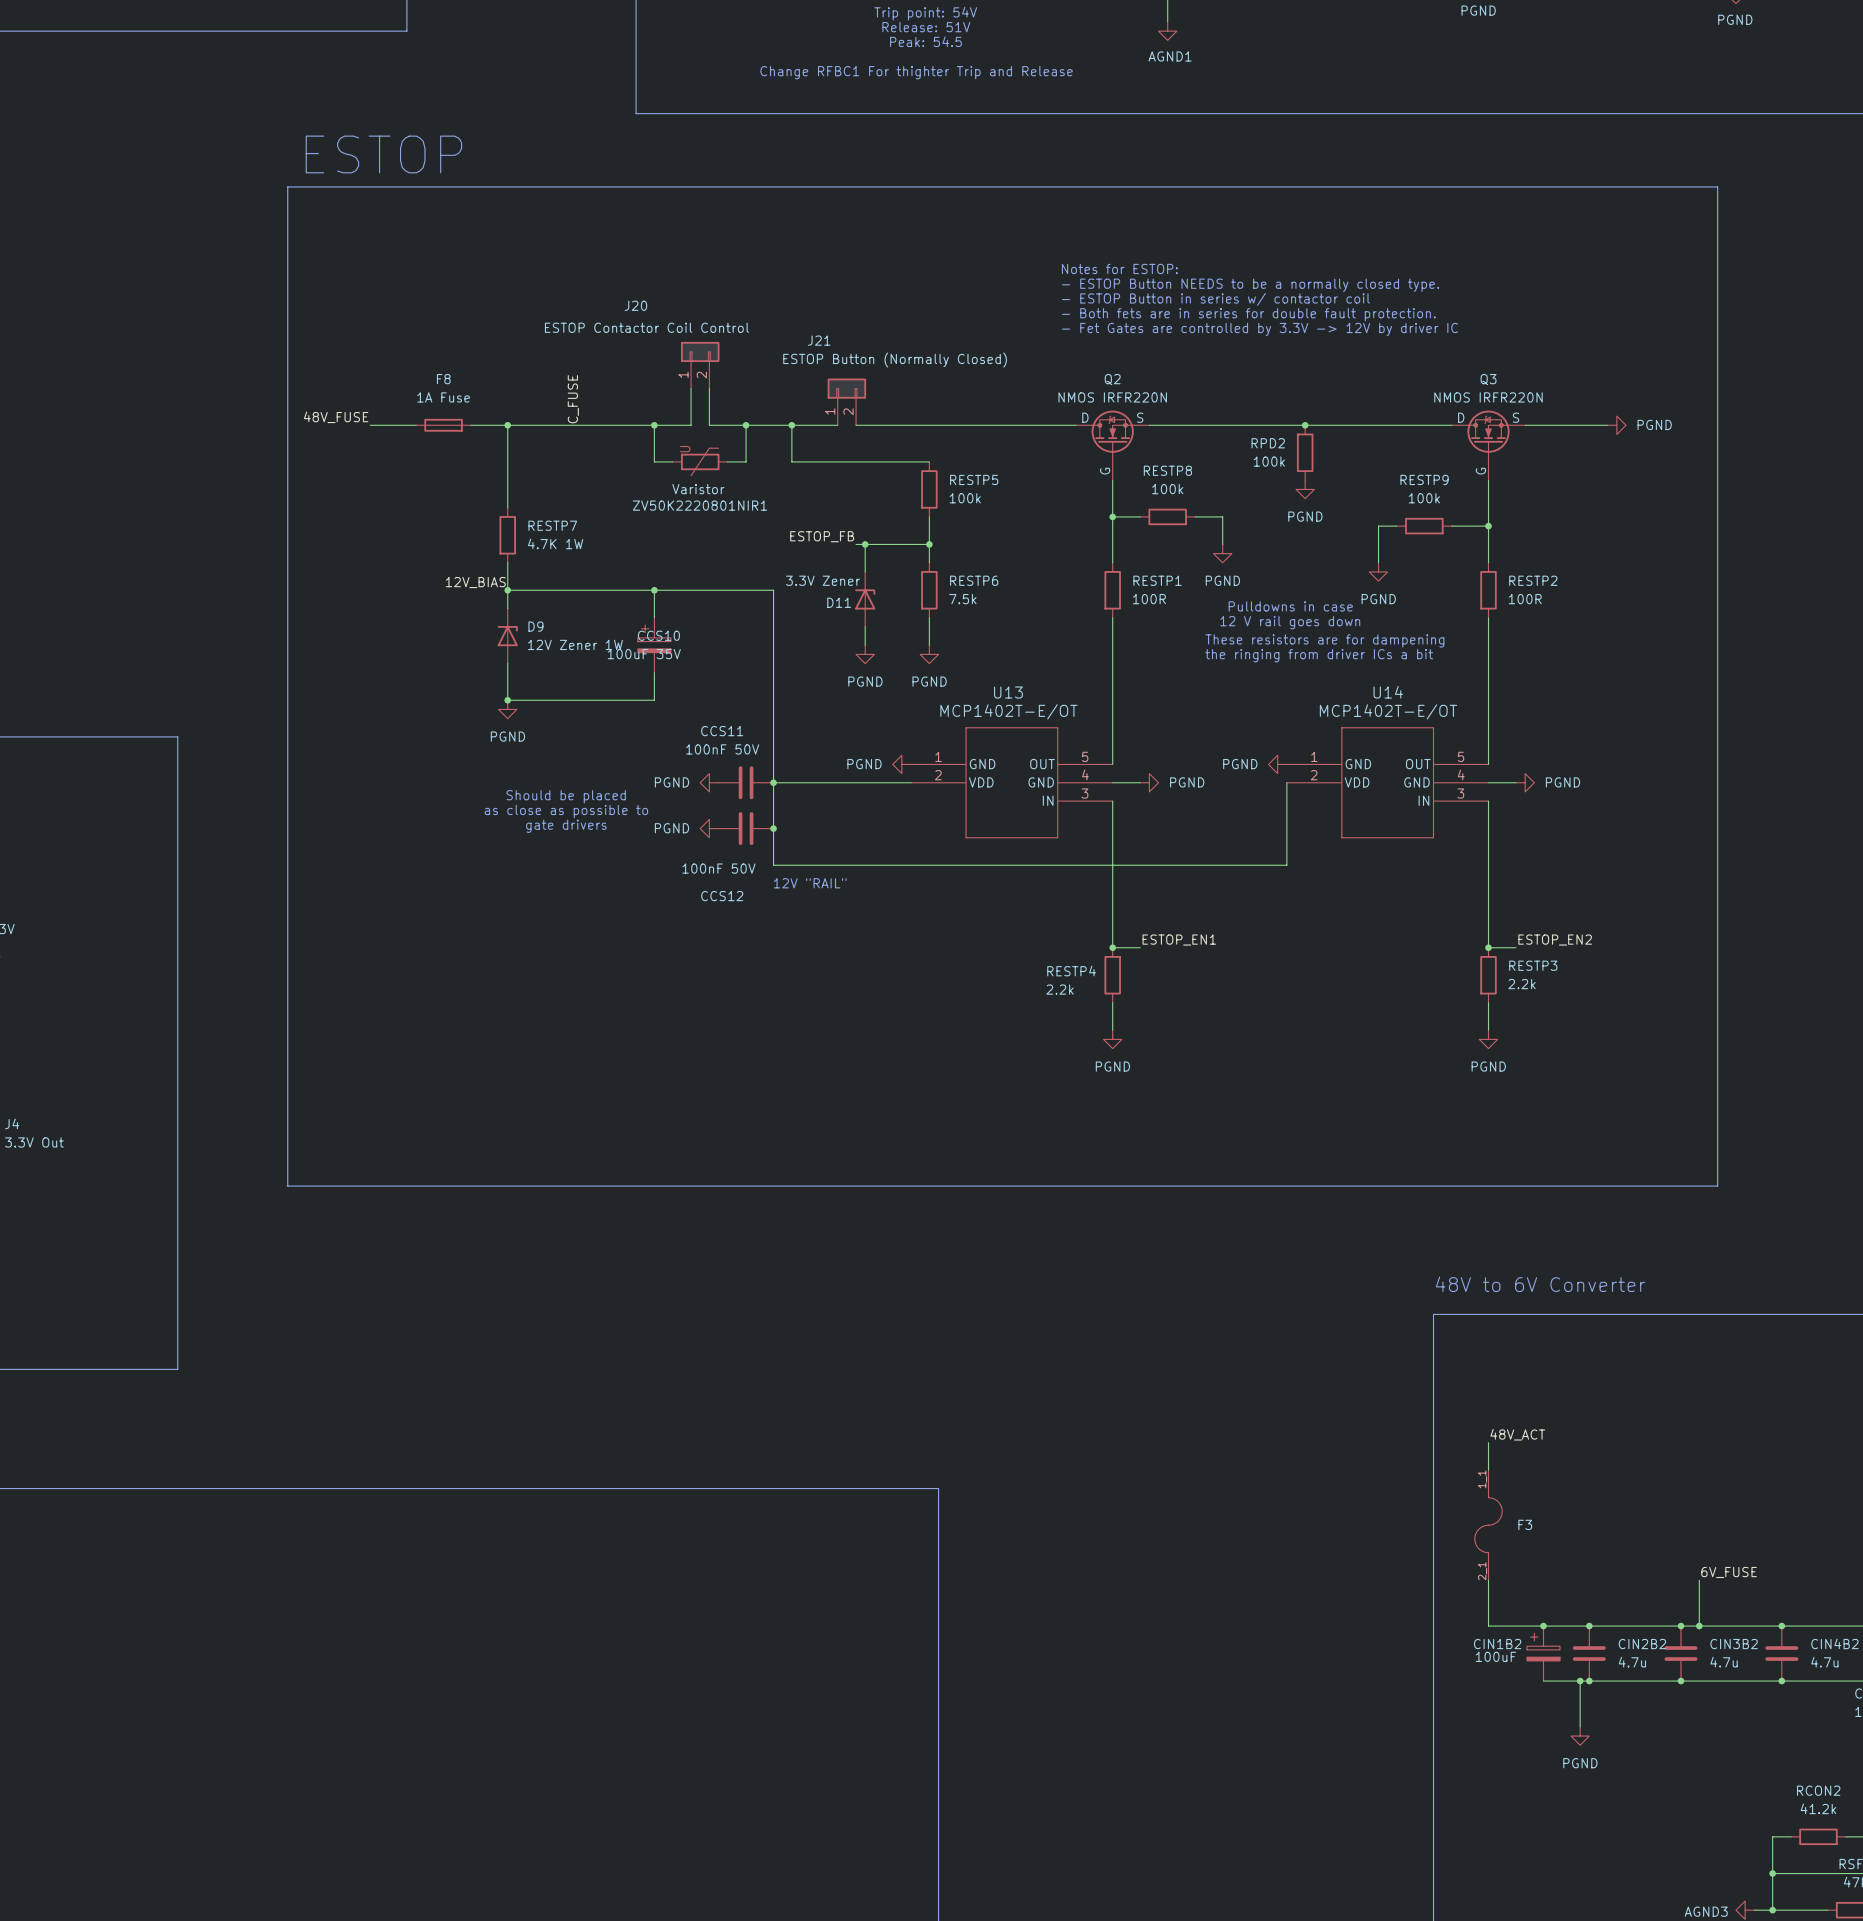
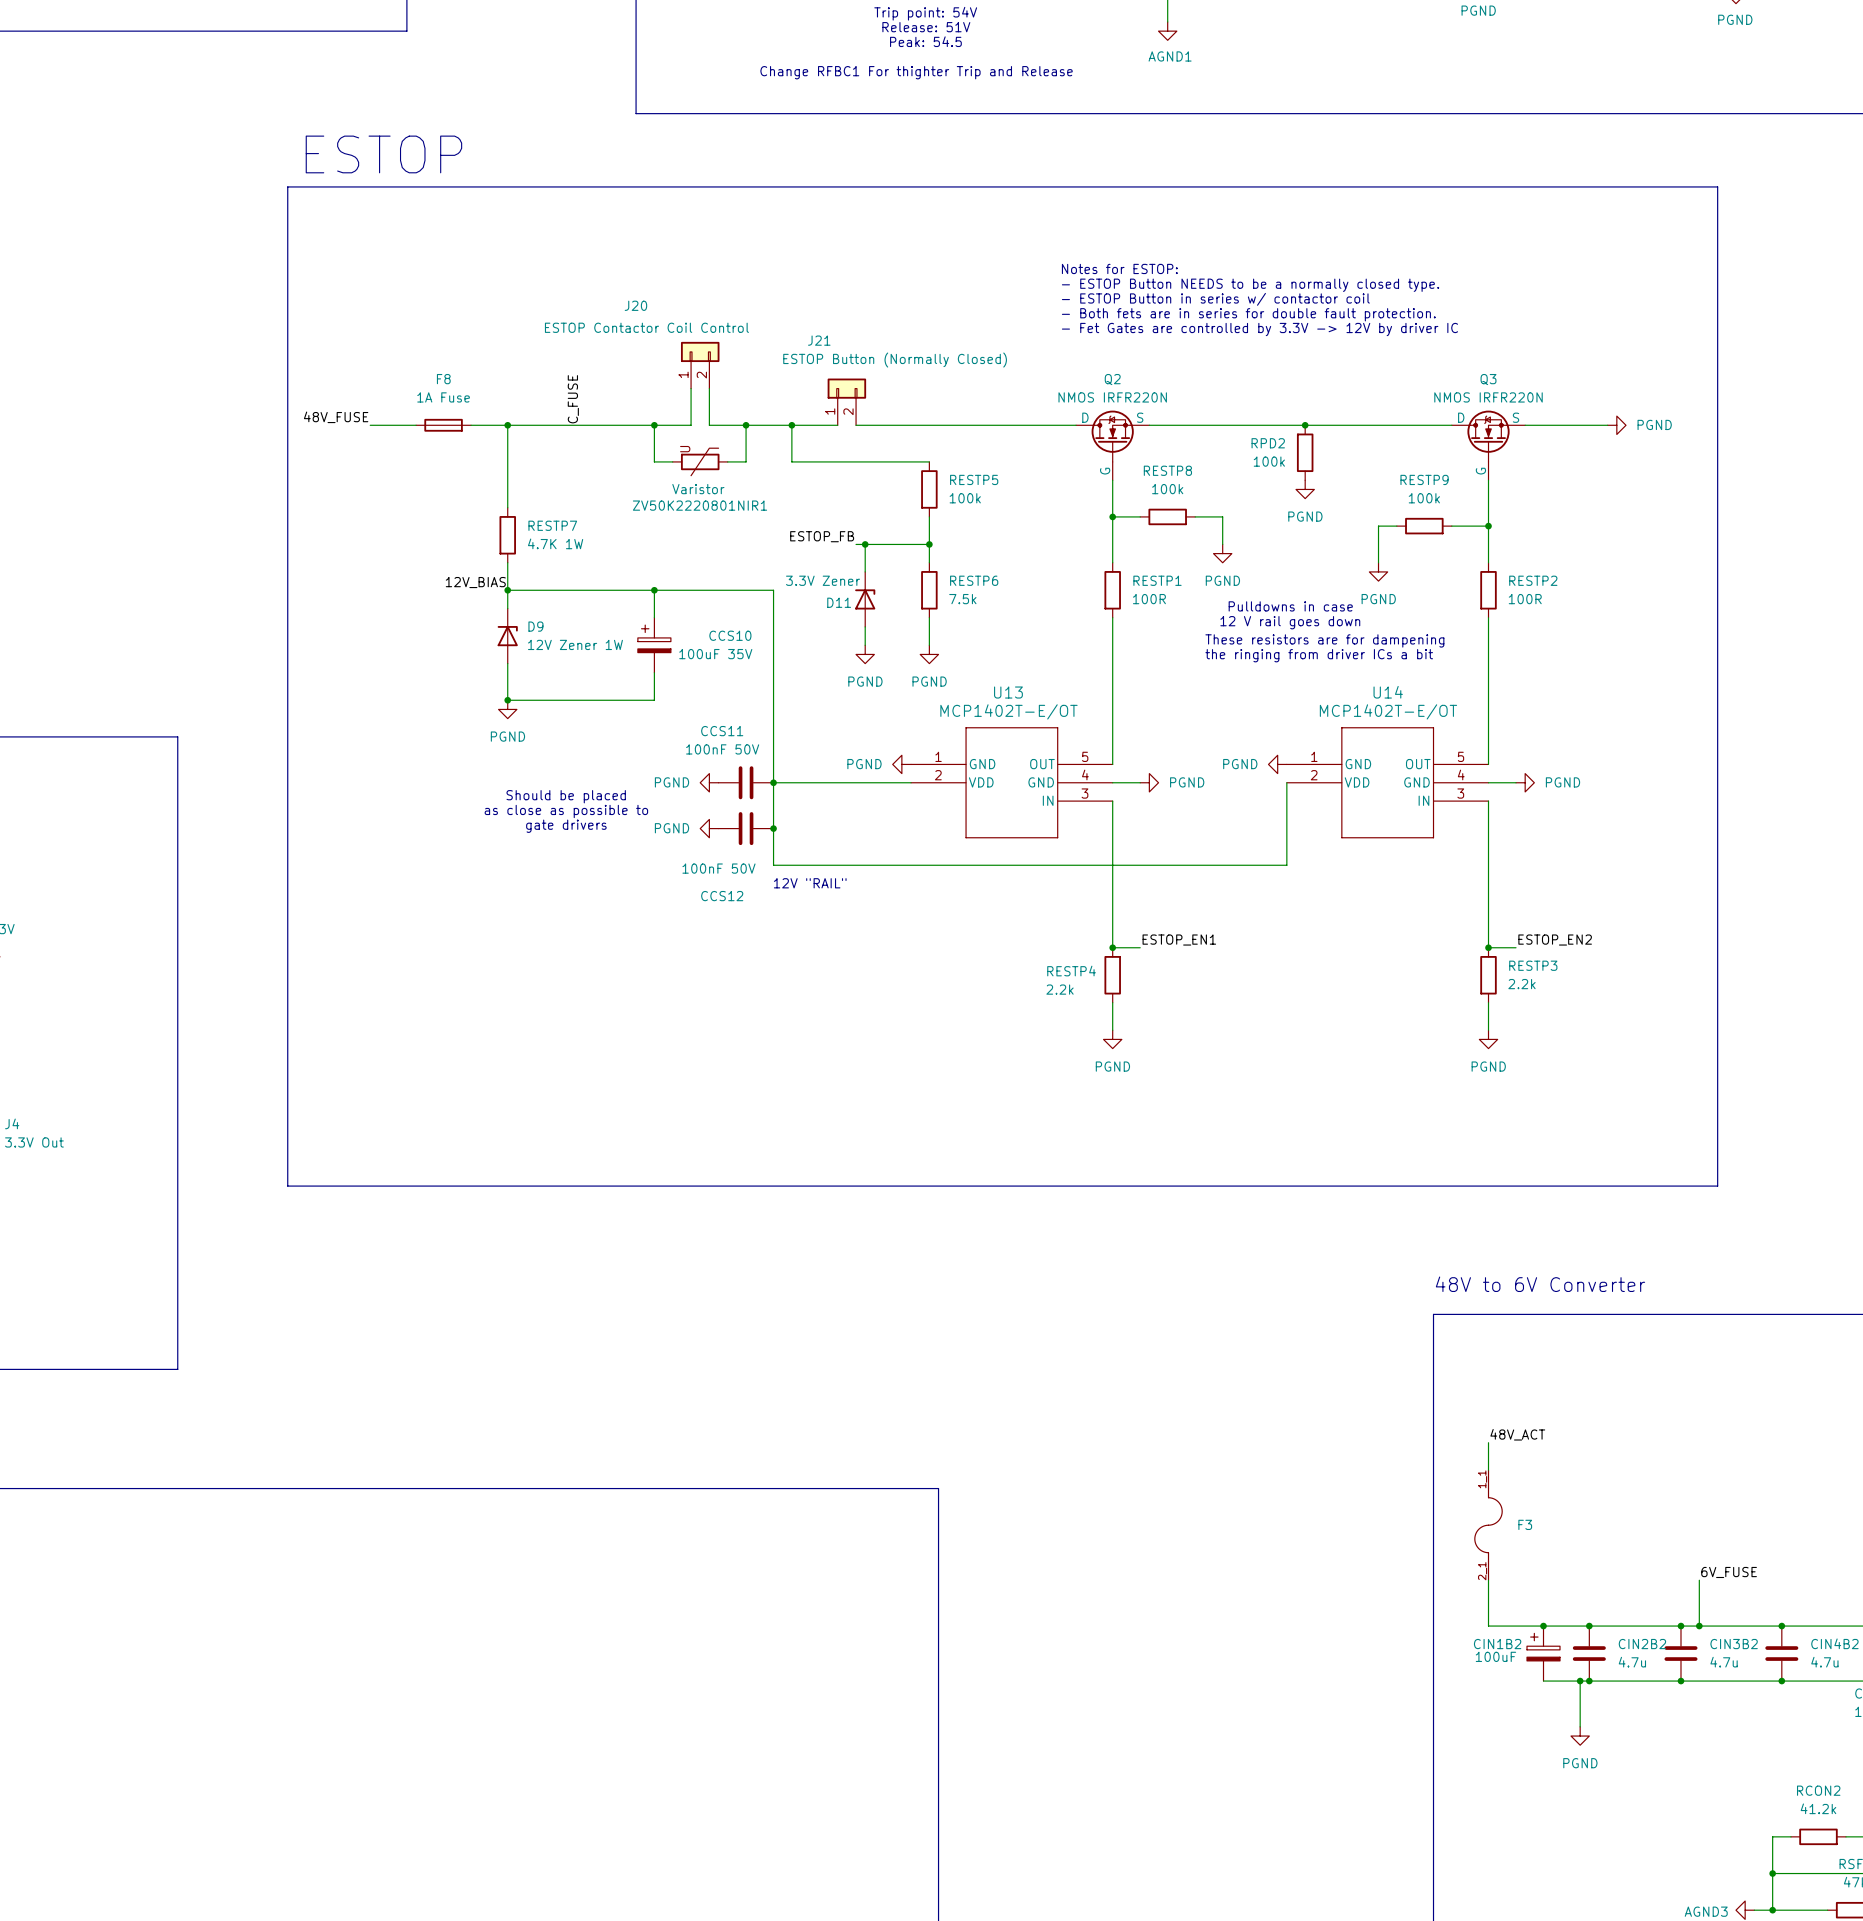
CCS10 name position: CCS10 (658, 635) -> CCS10 (730, 635)
CCS10 value position: 100uF 35V (644, 654) -> 100uF 35V (715, 654)

